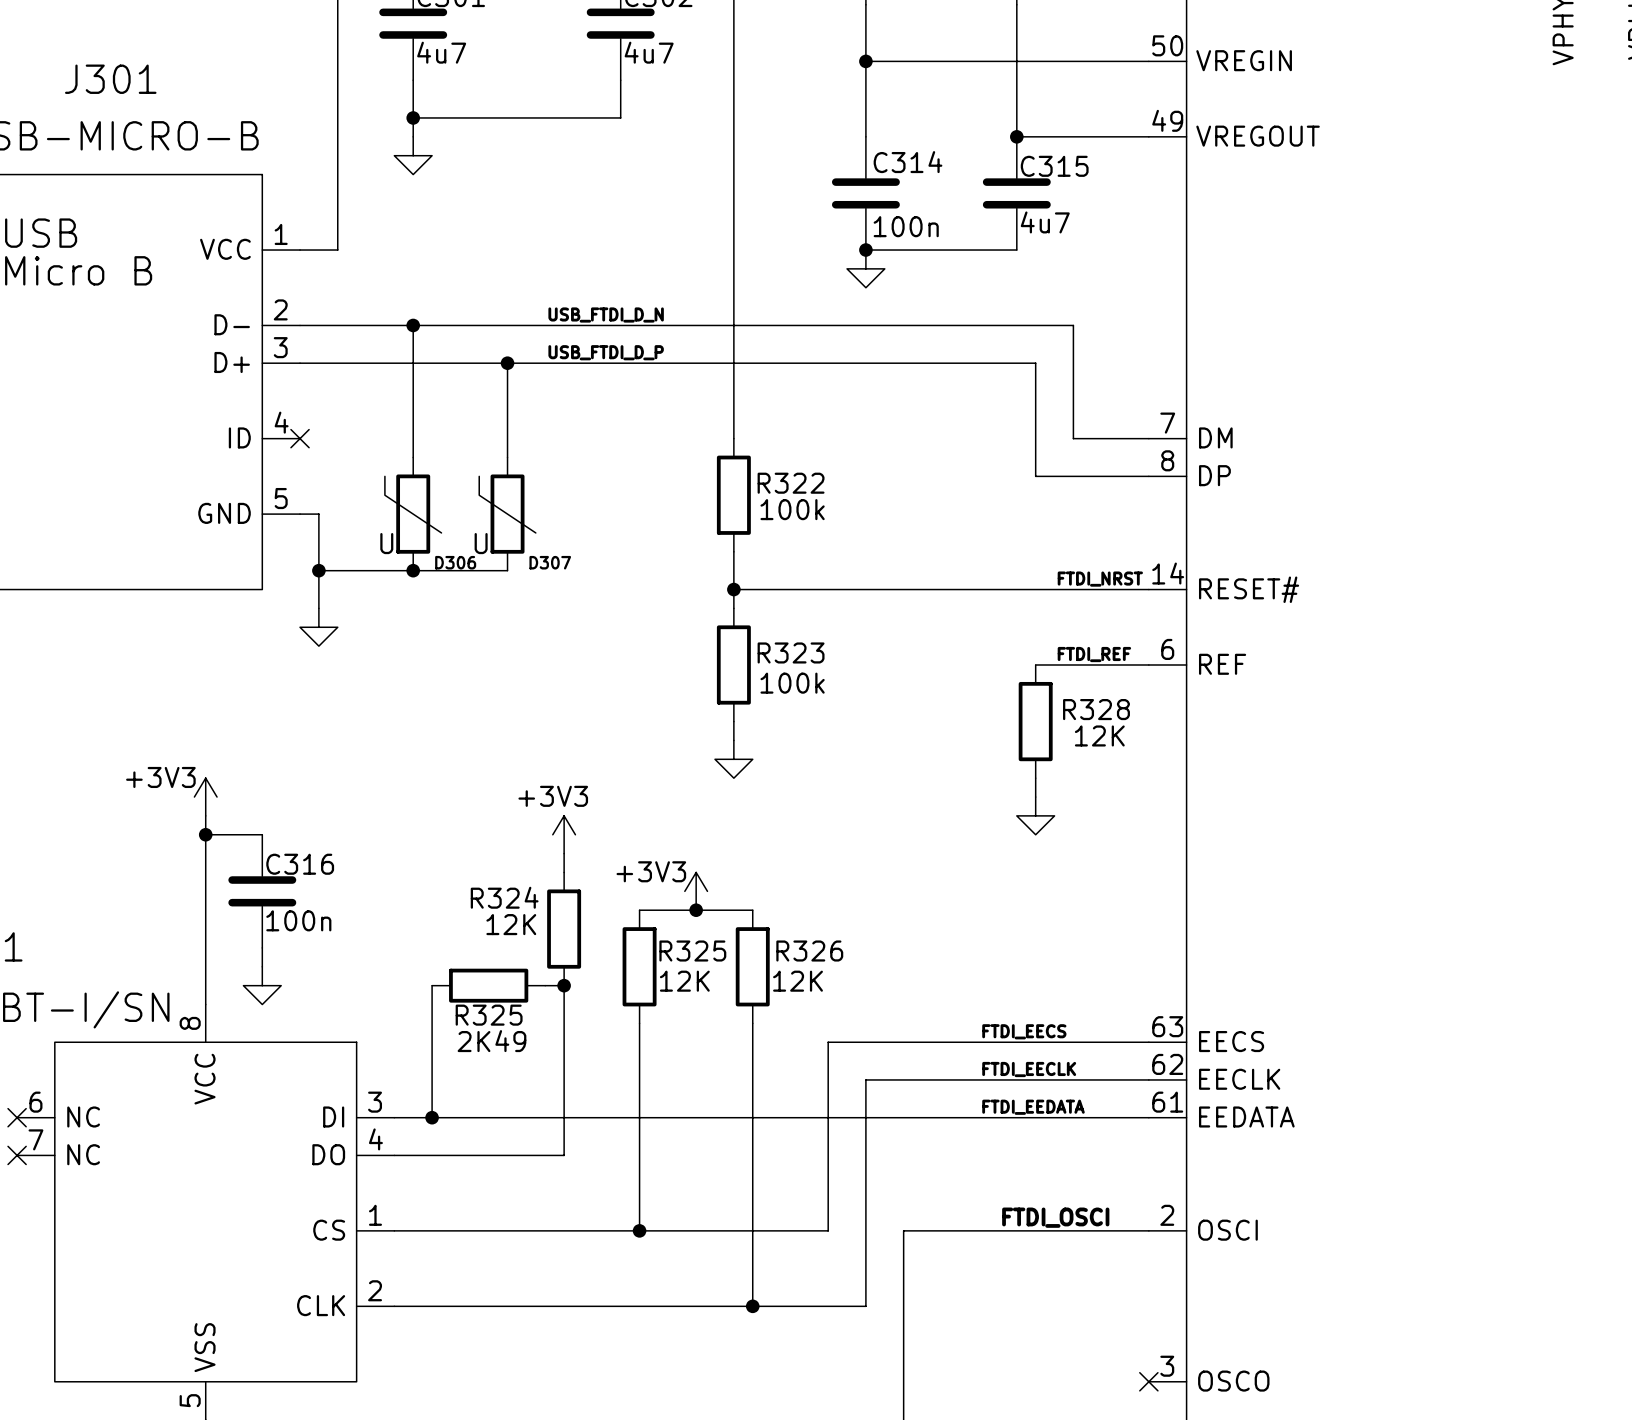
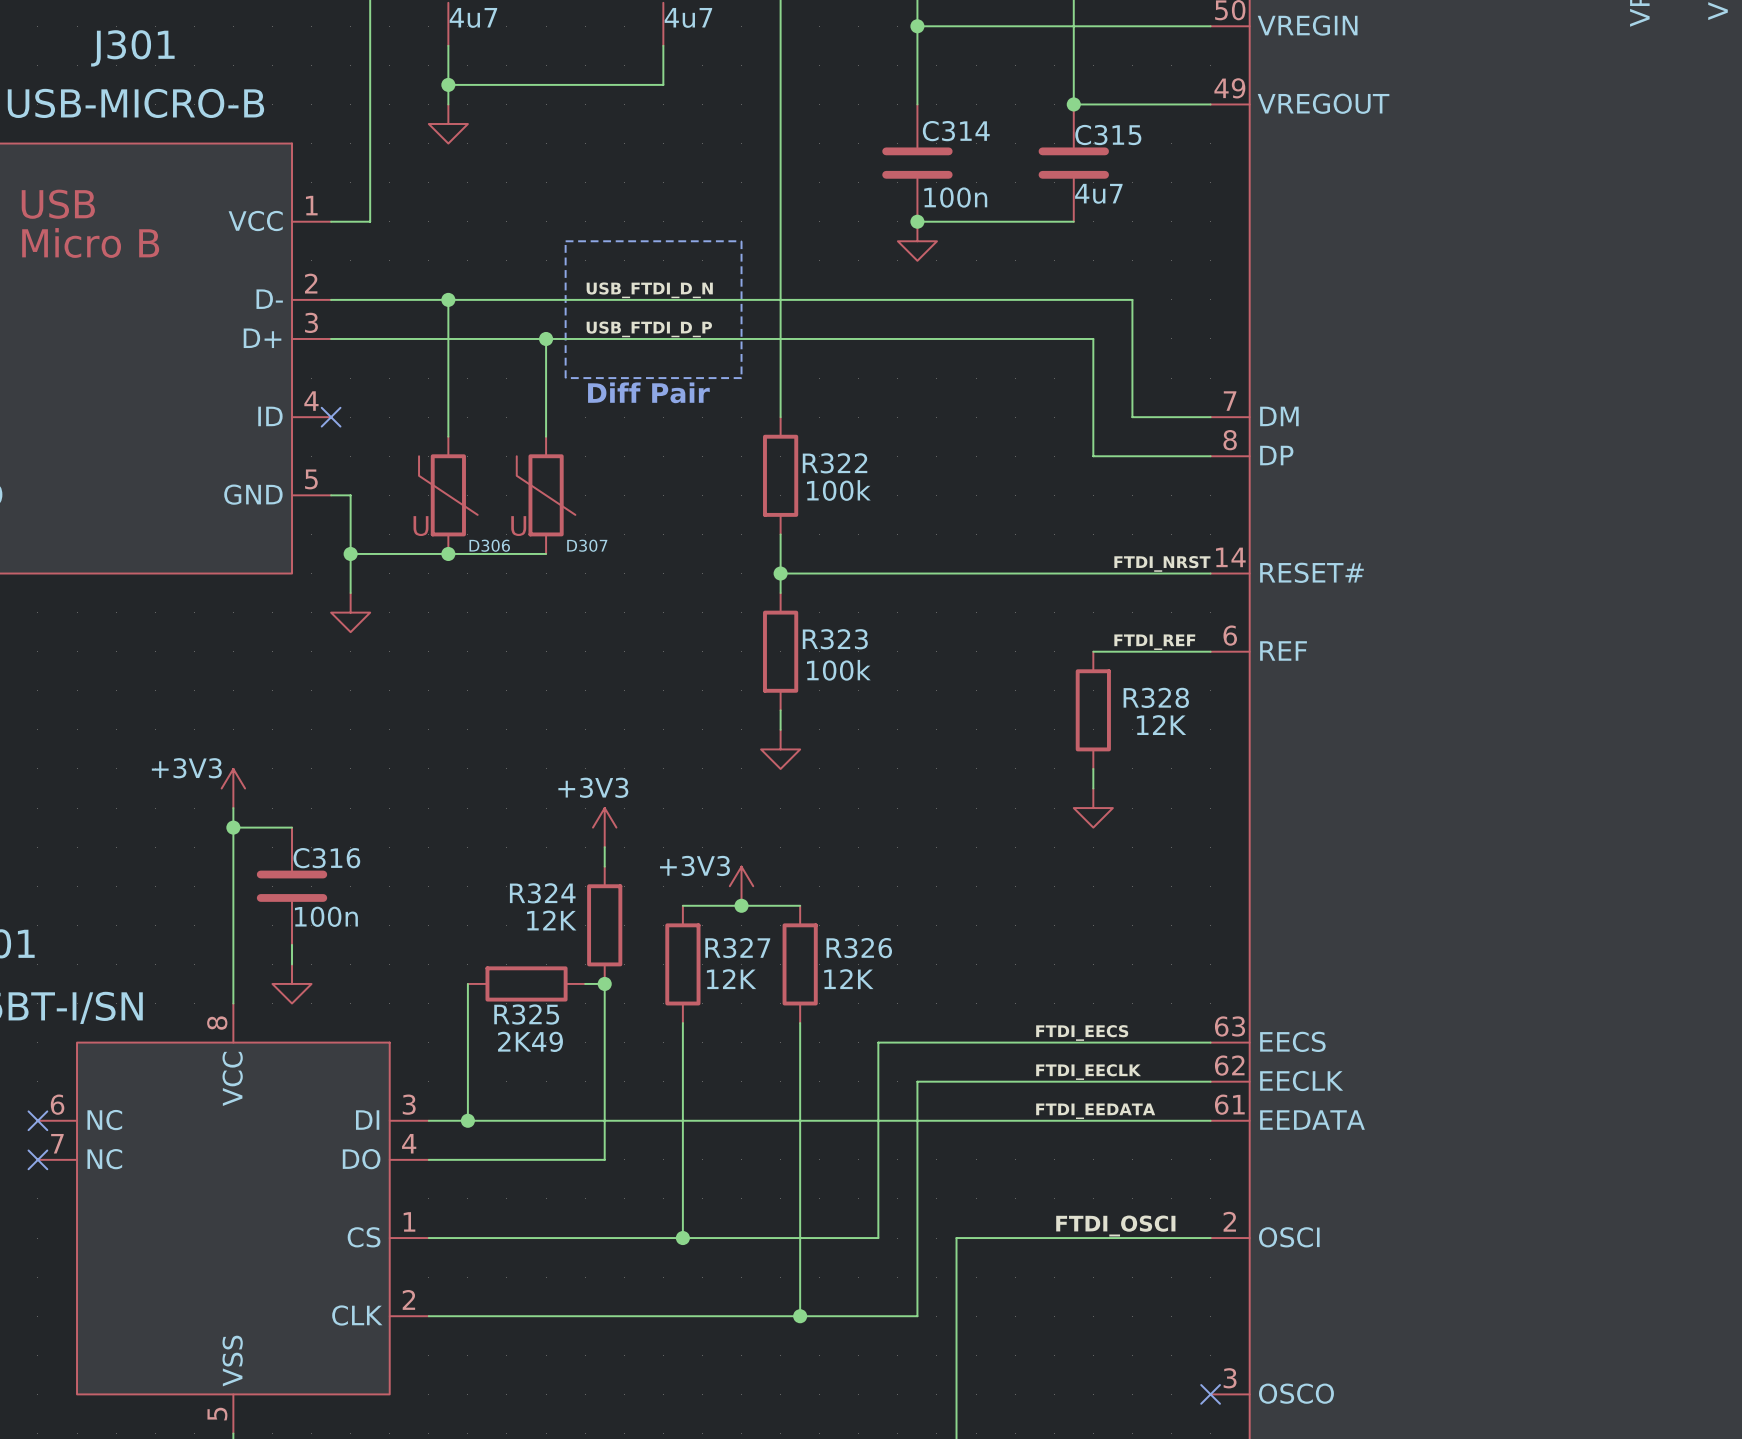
line: none -> (565, 241) (741, 241) (741, 378) (565, 378) (565, 241)
text: none -> Diff Pair (648, 392)
R325 name: R325 (692, 951) -> R327 (737, 948)

